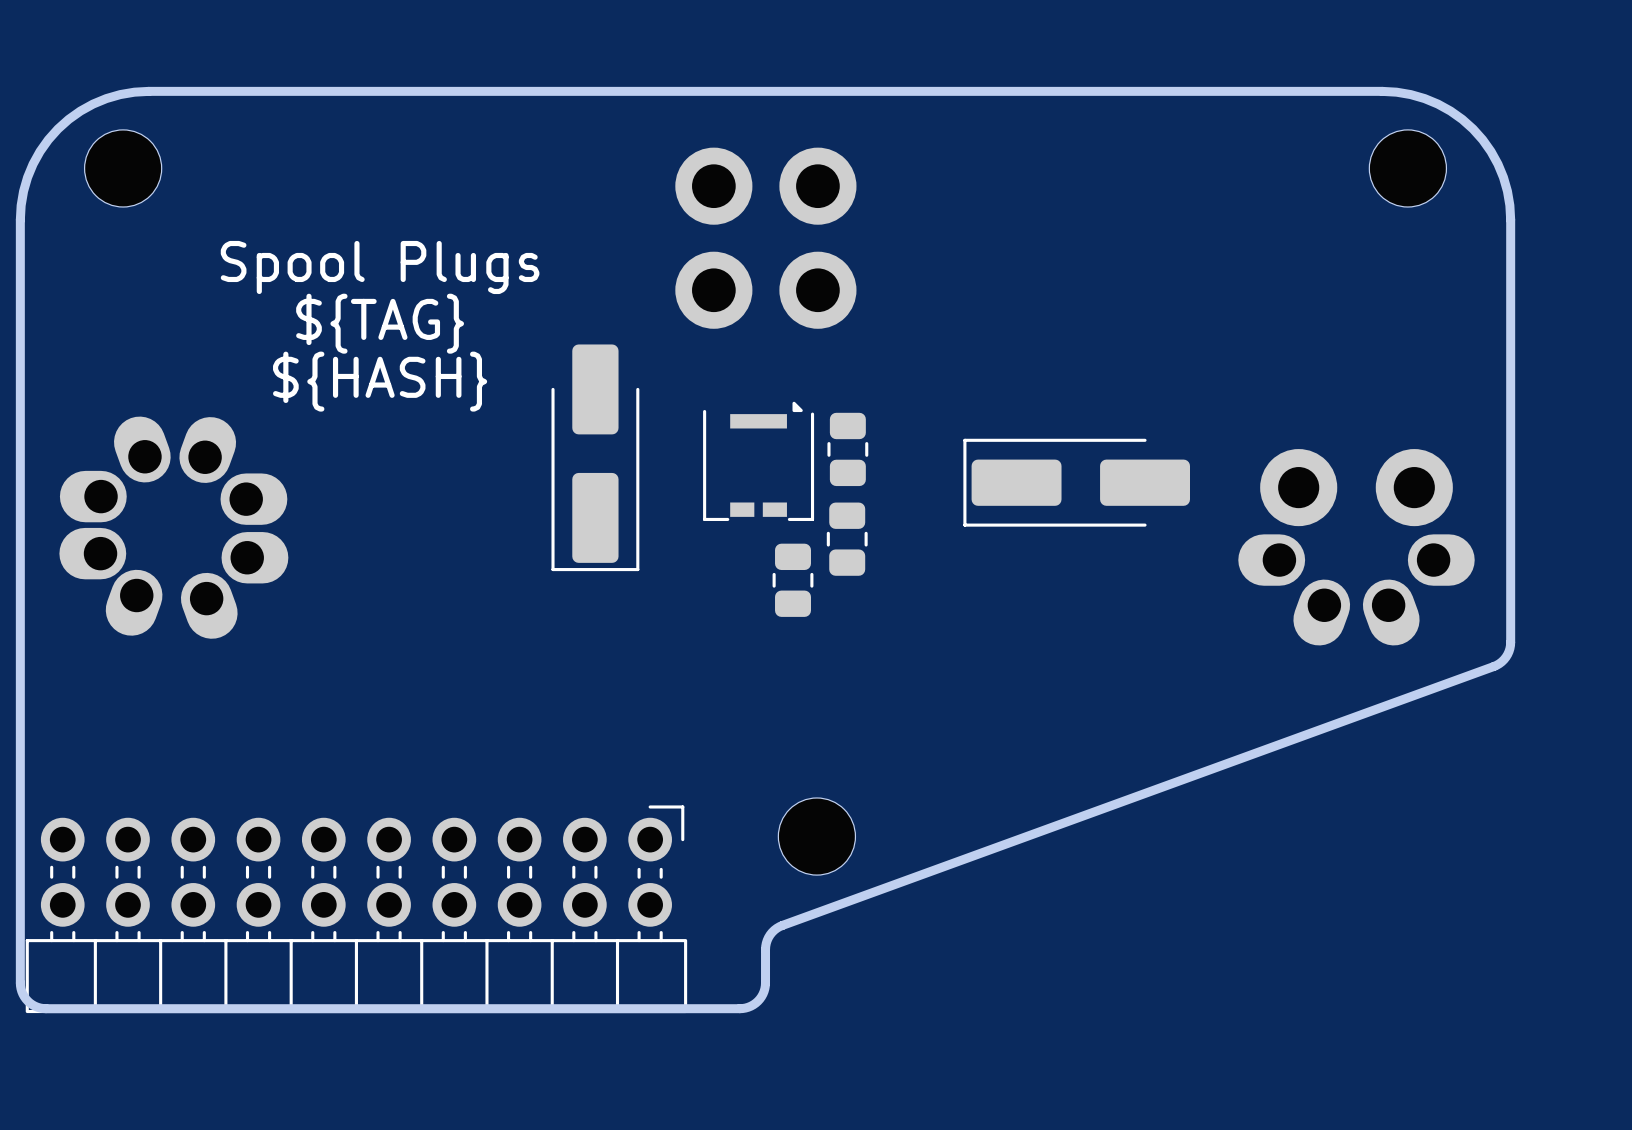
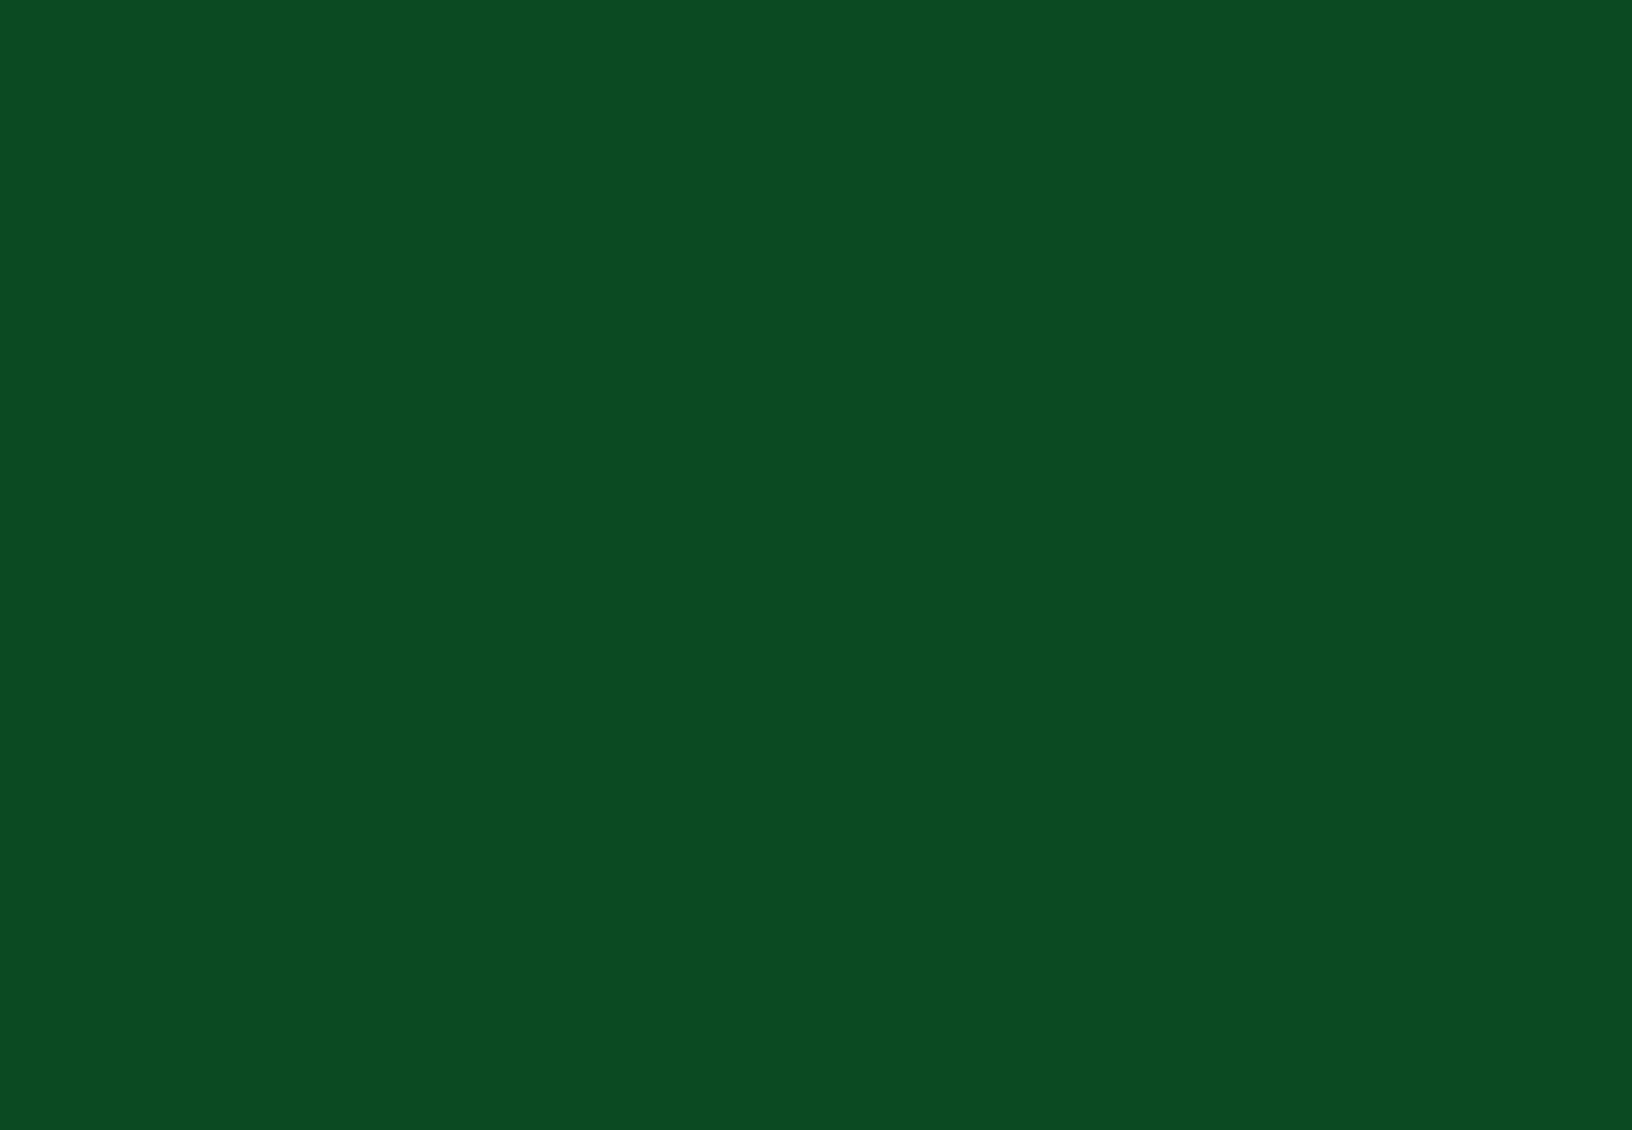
board edge: (148, 91) (1382, 91) (1396, 92) (1424, 98) (1450, 111) (1462, 119) (1482, 139) (1497, 164) (1507, 191) (1509, 205) (1510, 642) (1508, 651) (1501, 661) (1493, 666) (779, 926) (772, 932) (766, 943) (765, 985) (762, 994) (755, 1003) (745, 1008) (37, 1007) (25, 999) (20, 982) (21, 205) (27, 177) (33, 164) (40, 151) (57, 129) (80, 111) (93, 104) (120, 94) (148, 91) -> none
part: (123, 168) -> none
part: (1407, 168) -> none
part: (765, 238) -> none
text: Spool Plugs (380, 267) -> none
text: ${TAG} (380, 323) -> none
text: ${HASH} (380, 381) -> none
part: (847, 449) -> none
part: (595, 457) -> none
part: (758, 461) -> none
part: (1076, 482) -> none
part: (173, 527) -> none
part: (847, 539) -> none
part: (1356, 547) -> none
part: (793, 580) -> none
part: (816, 836) -> none
part: (356, 909) -> none

